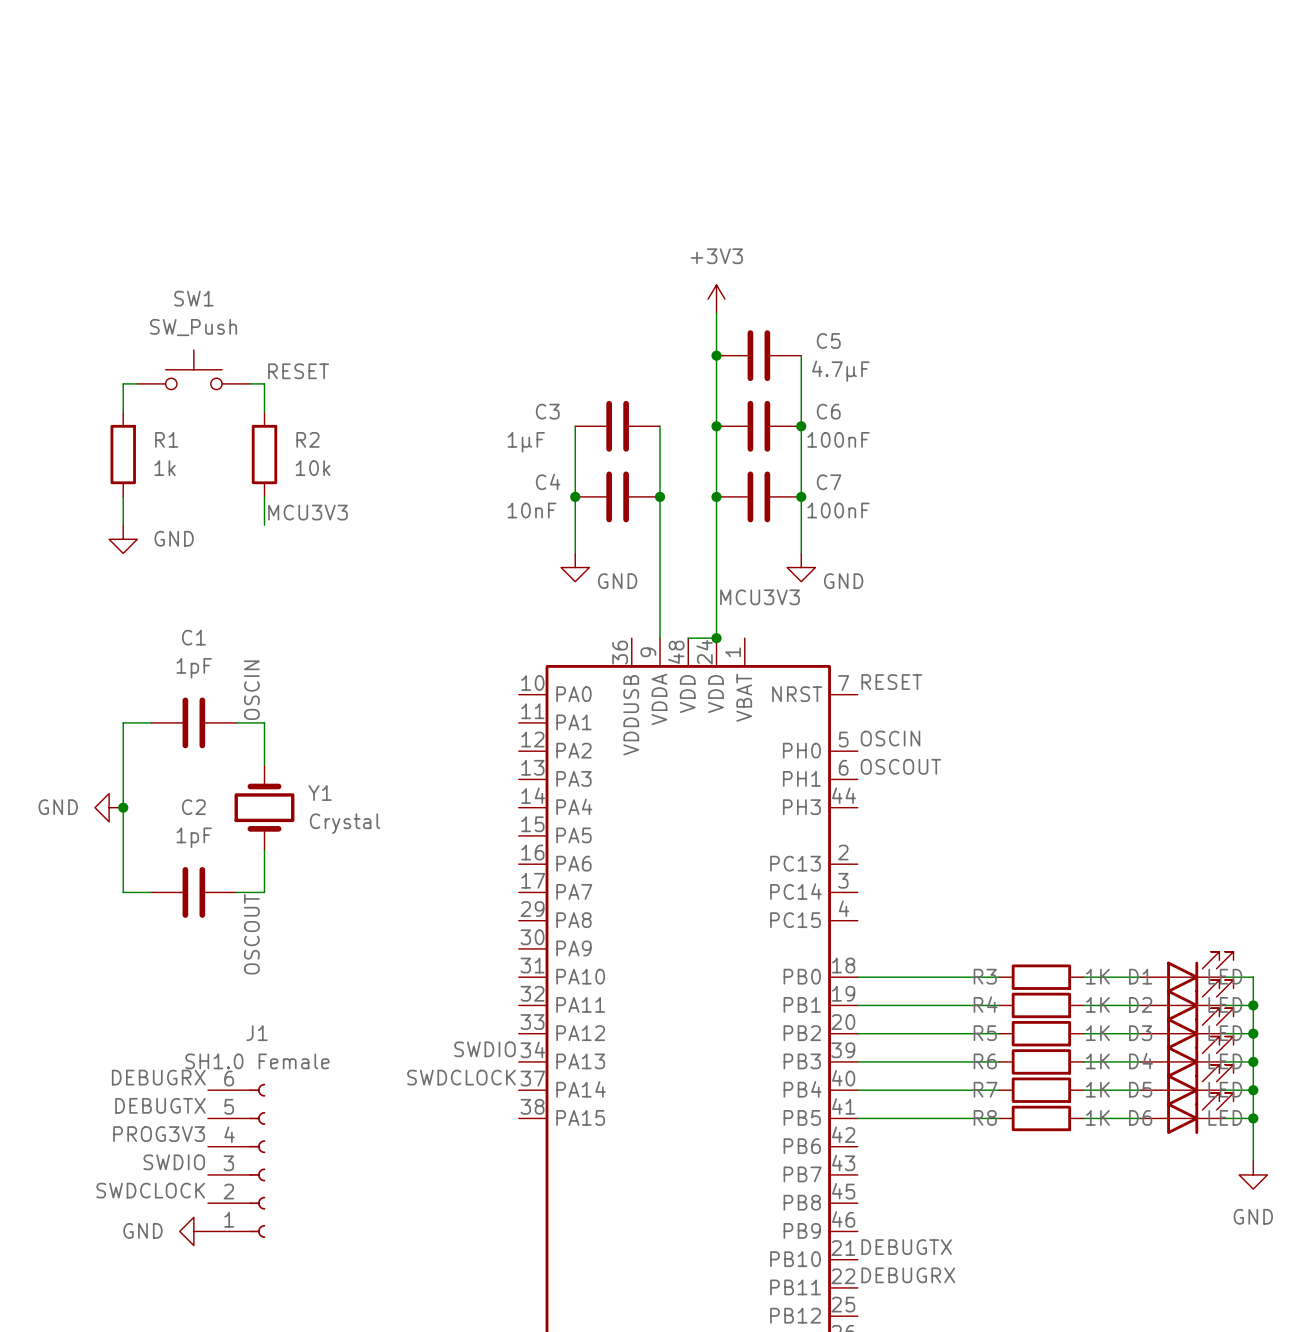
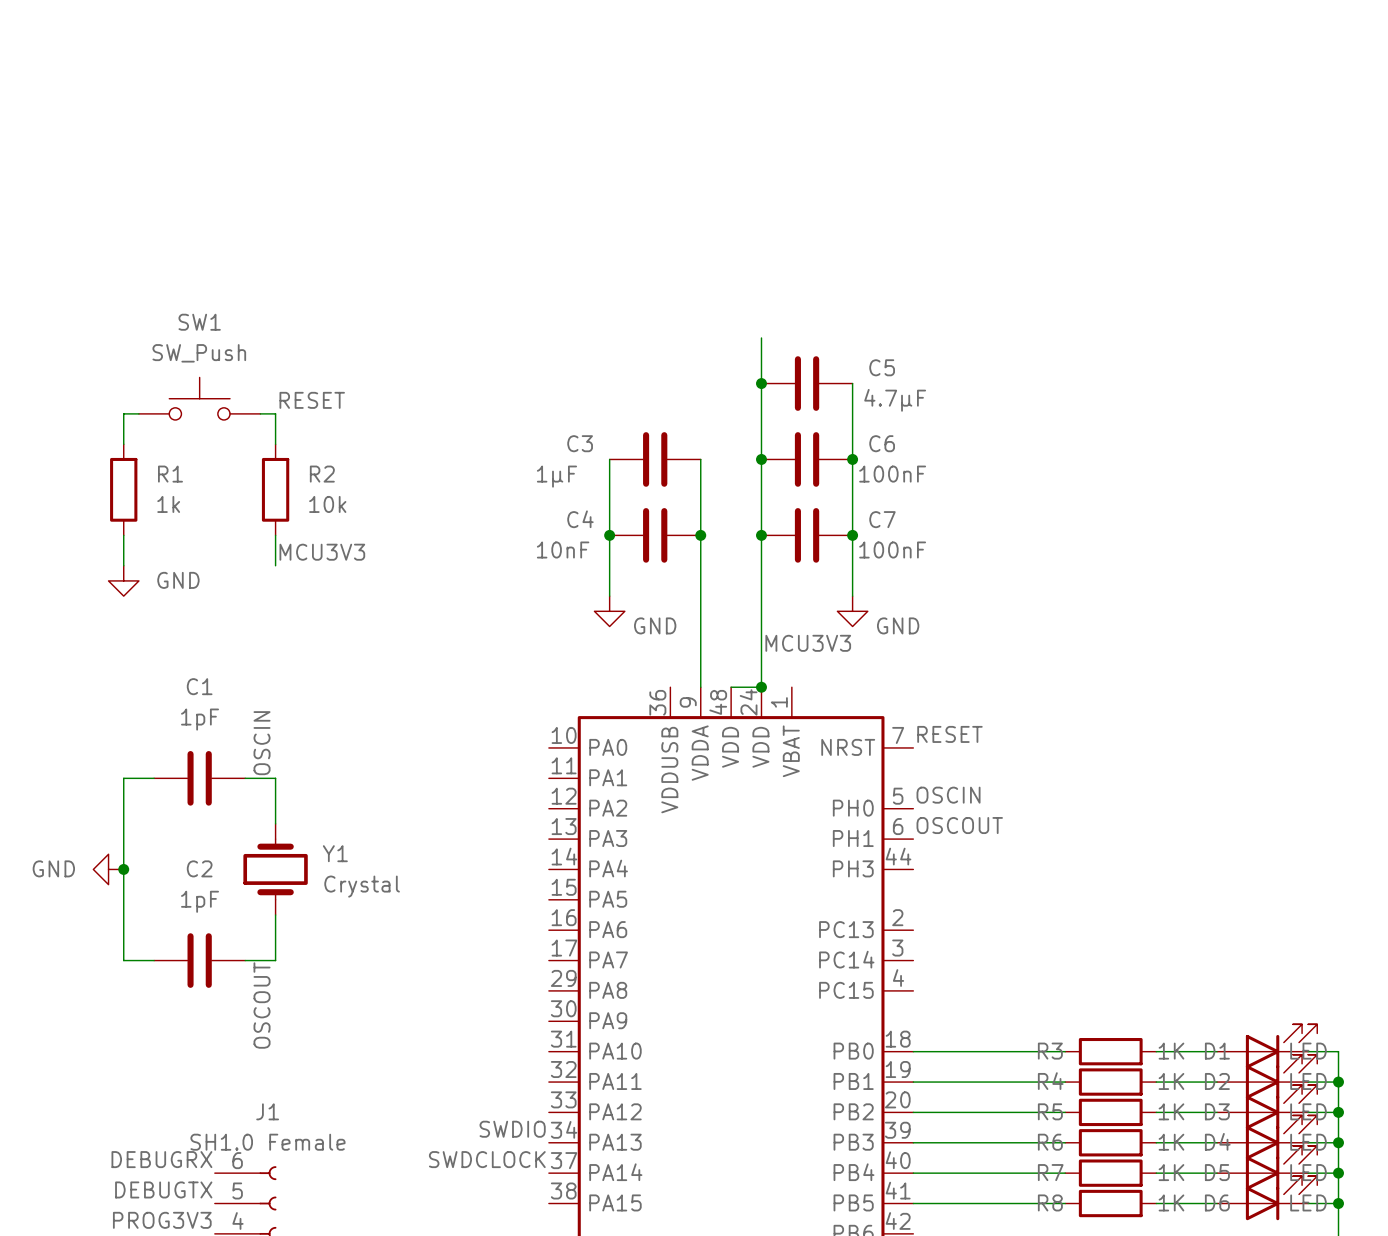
power symbol: +3V3 (716, 299) -> none

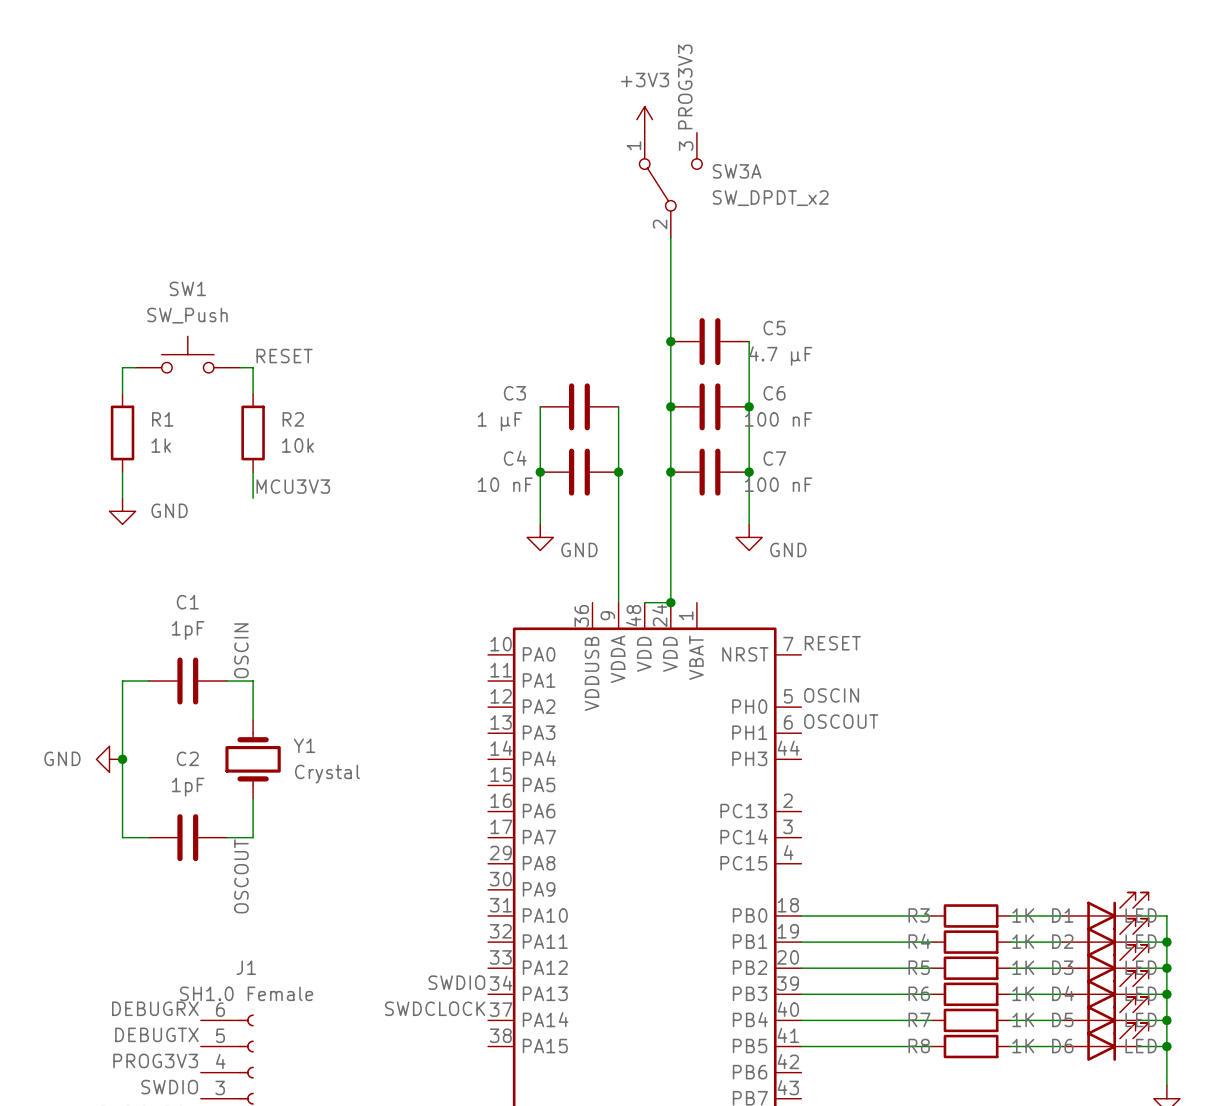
label: none -> PROG3V3 (685, 86)
power symbol: none -> +3V3 (644, 119)
SW3A: none -> SW_DPDT_x2 (670, 184)
wire: none -> (670, 237) (670, 302)
C5 value: 4.7µF (895, 400) -> 4.7 µF (780, 356)
C6 value: 100nF (892, 474) -> 100 nF (778, 419)
C3 value: 1µF (556, 476) -> 1 µF (499, 421)
C4 value: 10nF (563, 550) -> 10 nF (505, 484)
C7 value: 100nF (892, 550) -> 100 nF (778, 484)
label: MCU3V3 (808, 643) -> none

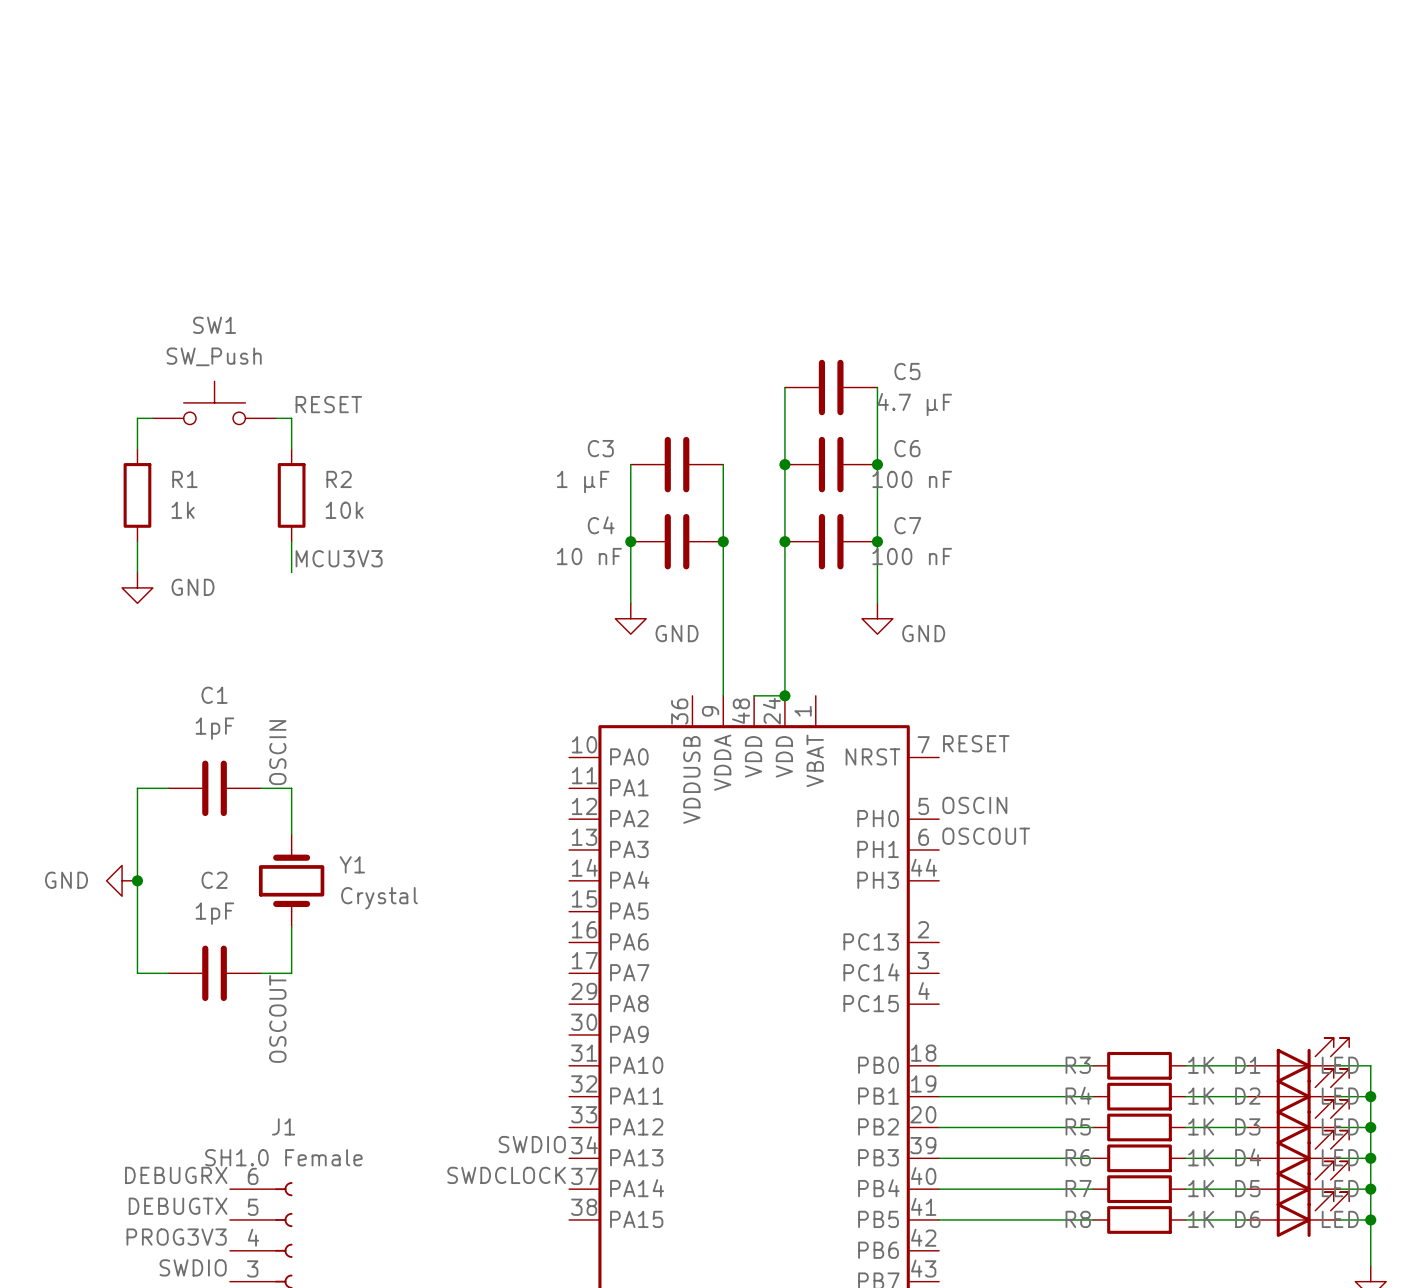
label: PROG3V3 (685, 86) -> none
power symbol: +3V3 (644, 119) -> none
SW3A: SW_DPDT_x2 (670, 184) -> none
wire: (670, 237) (670, 341) -> none
junction: (670, 341) -> none

